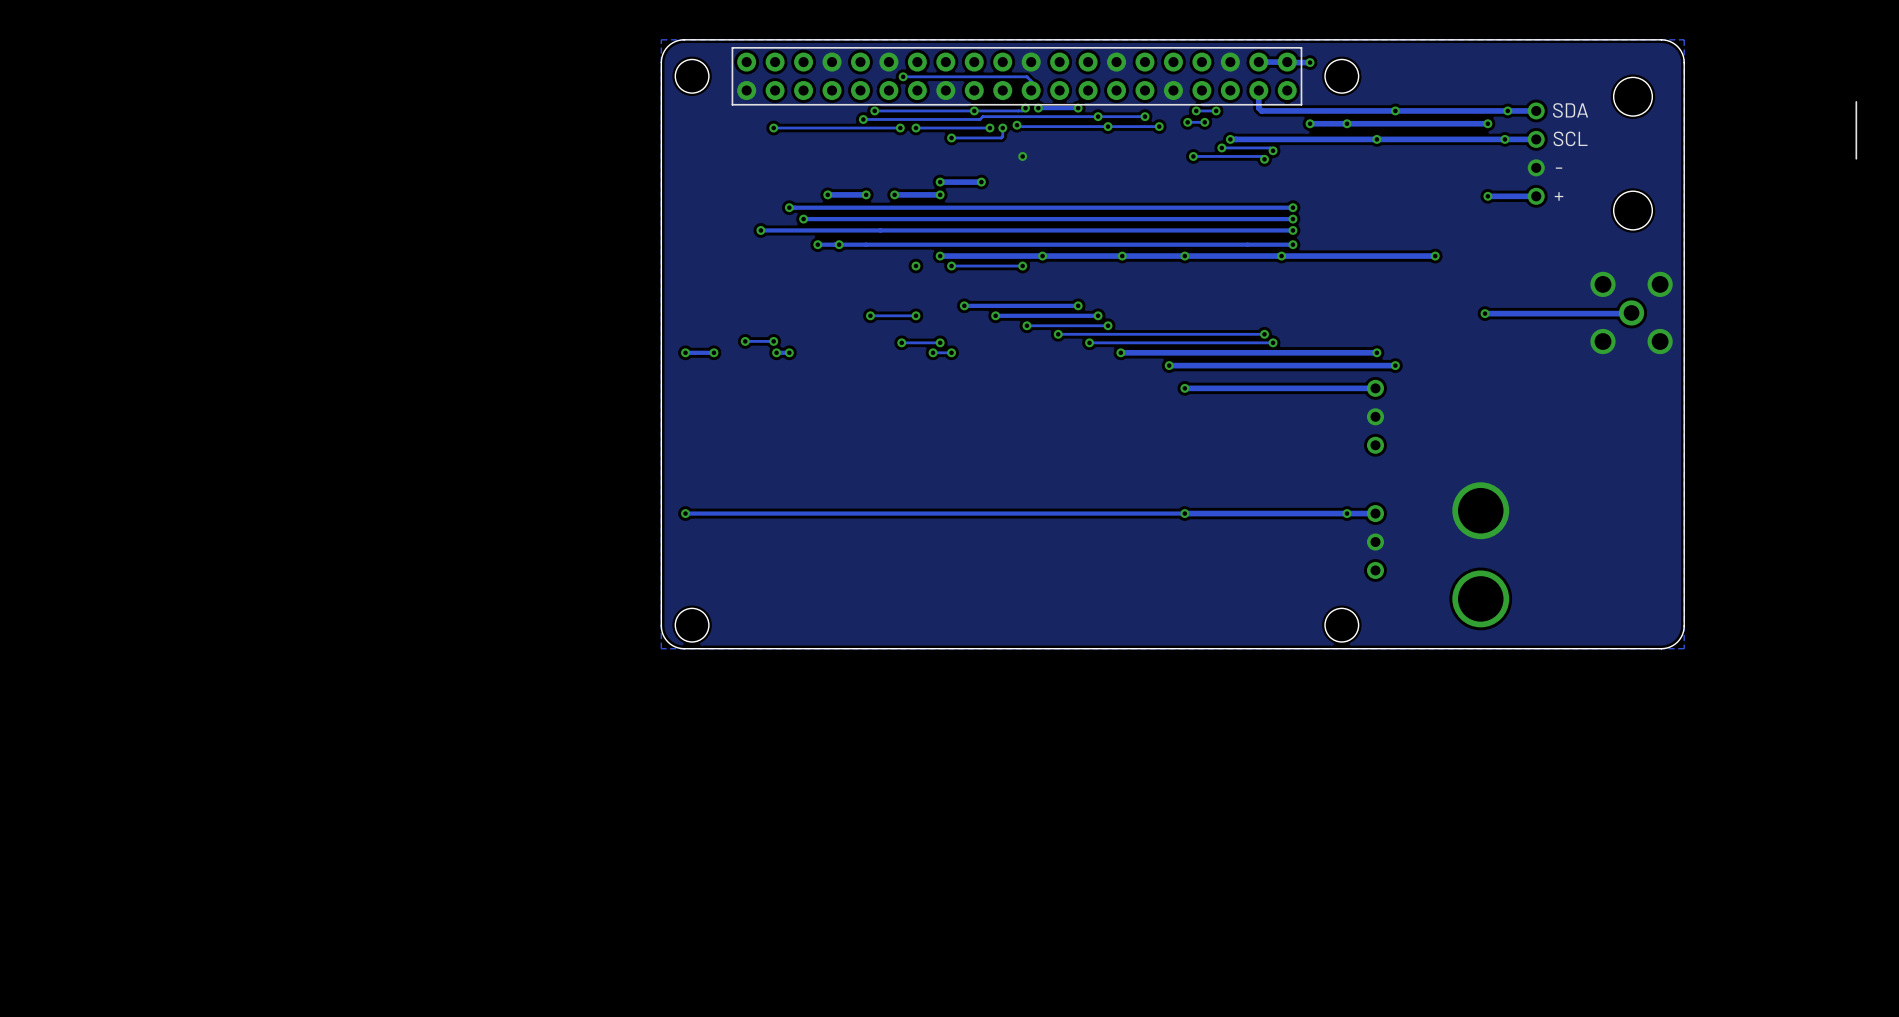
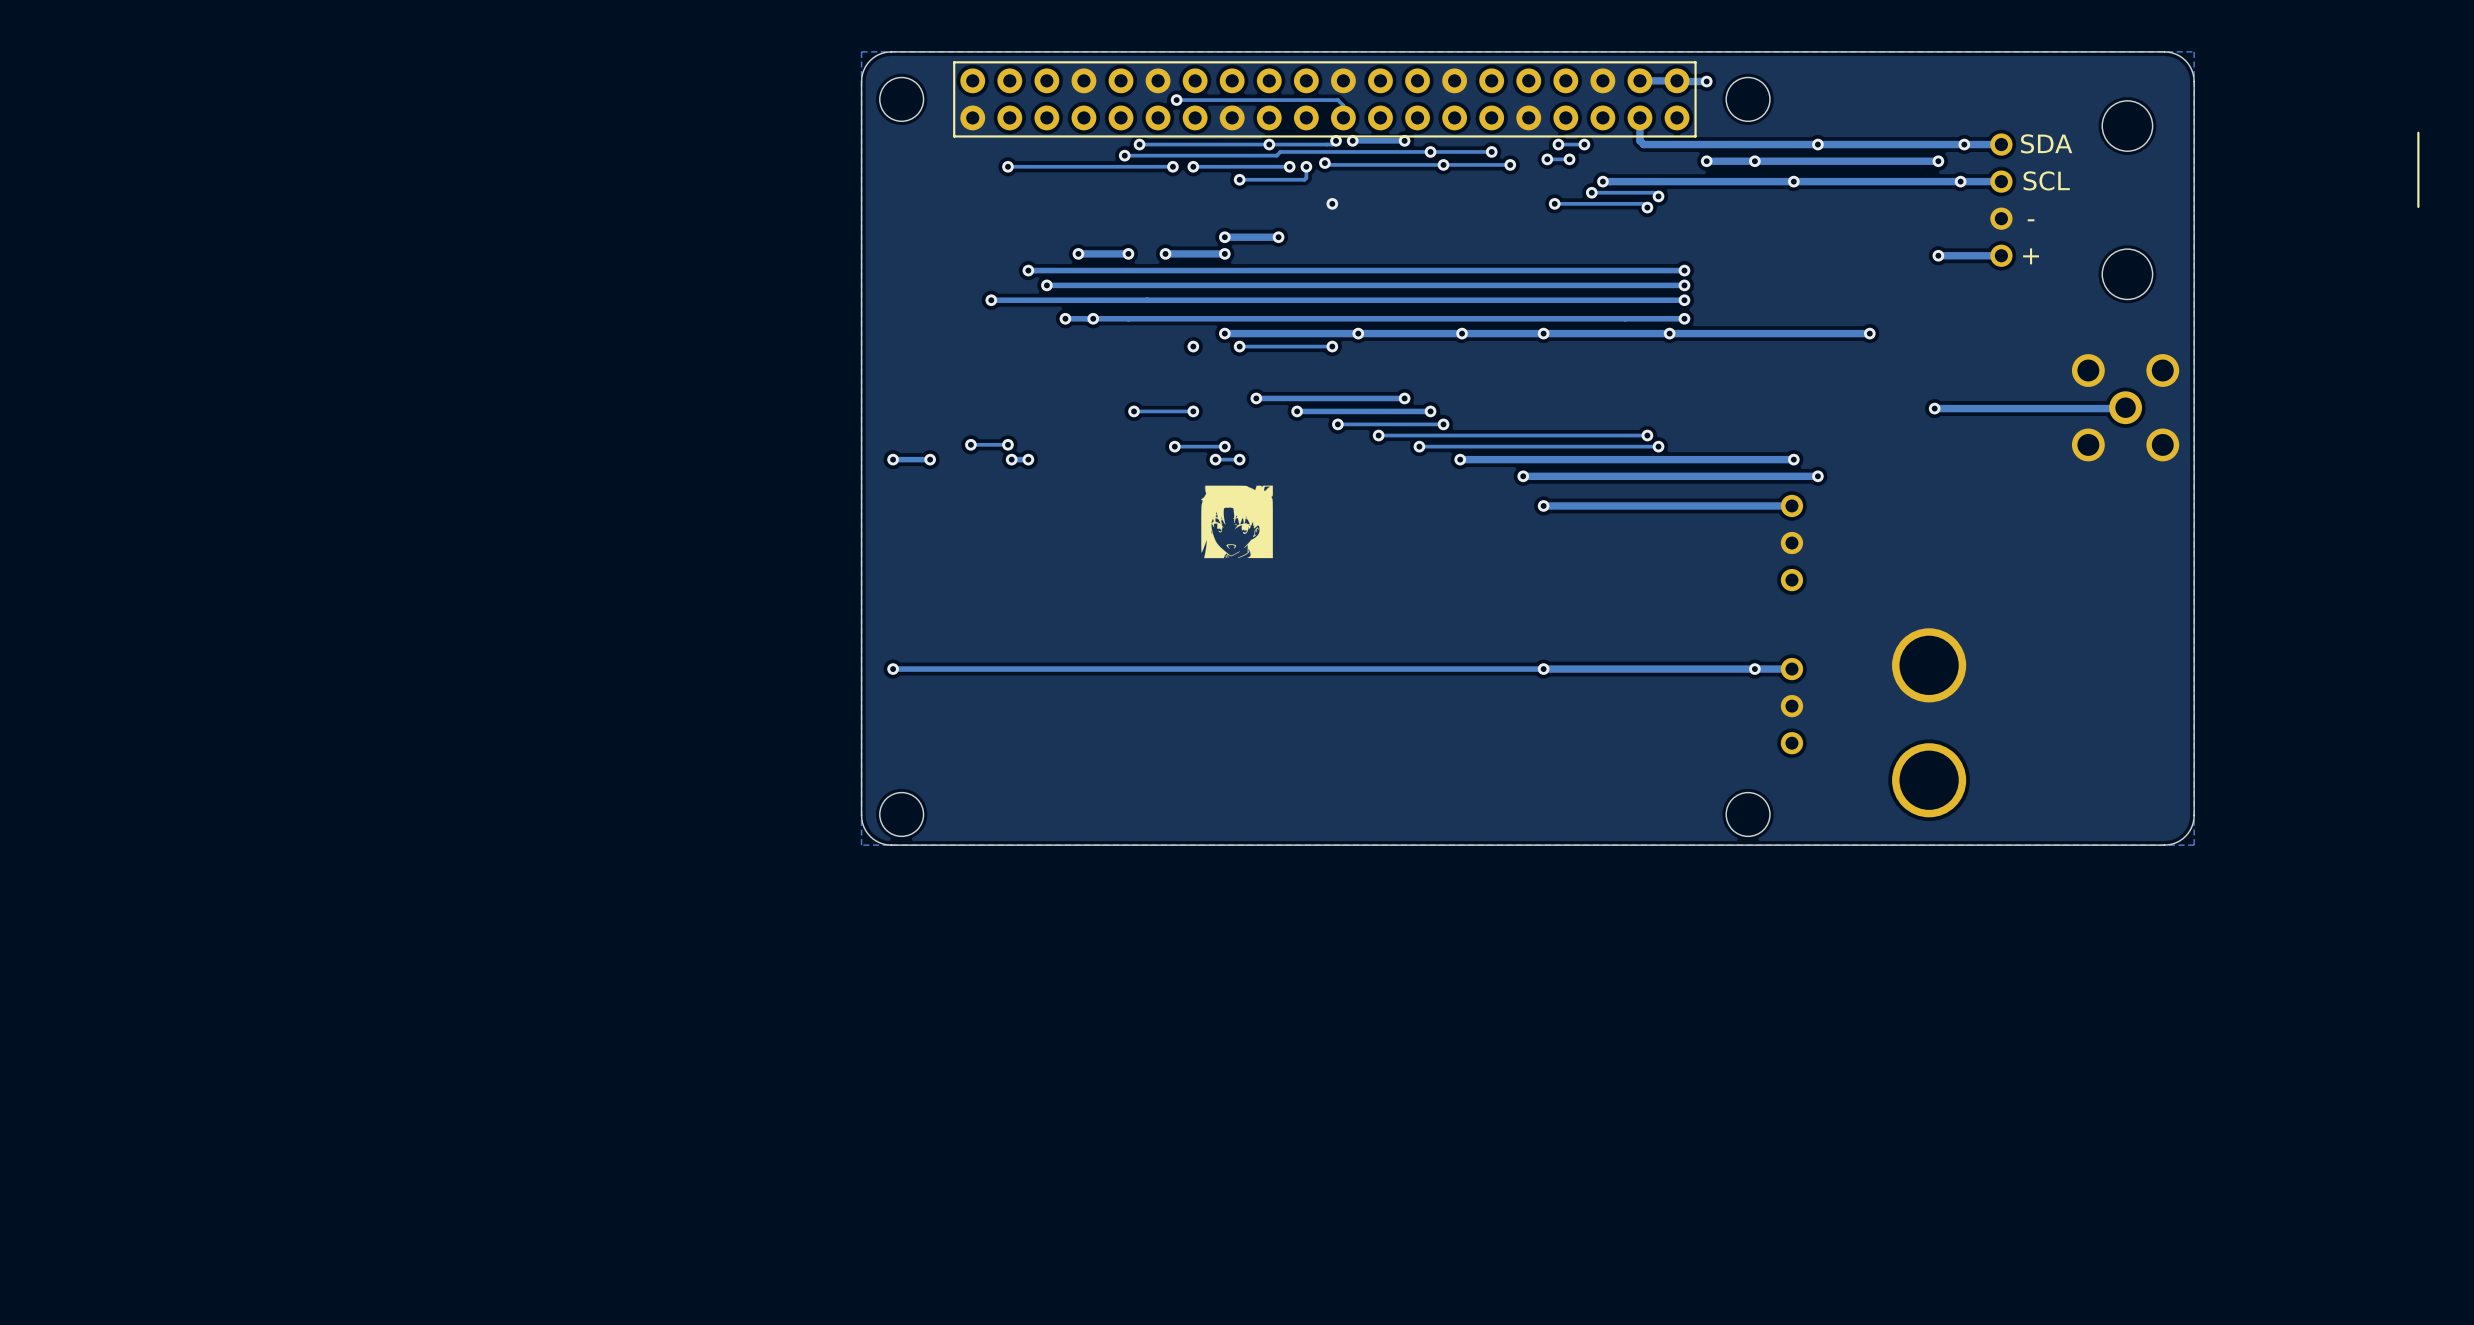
drawing: none -> [1201, 485, 1273, 559]

